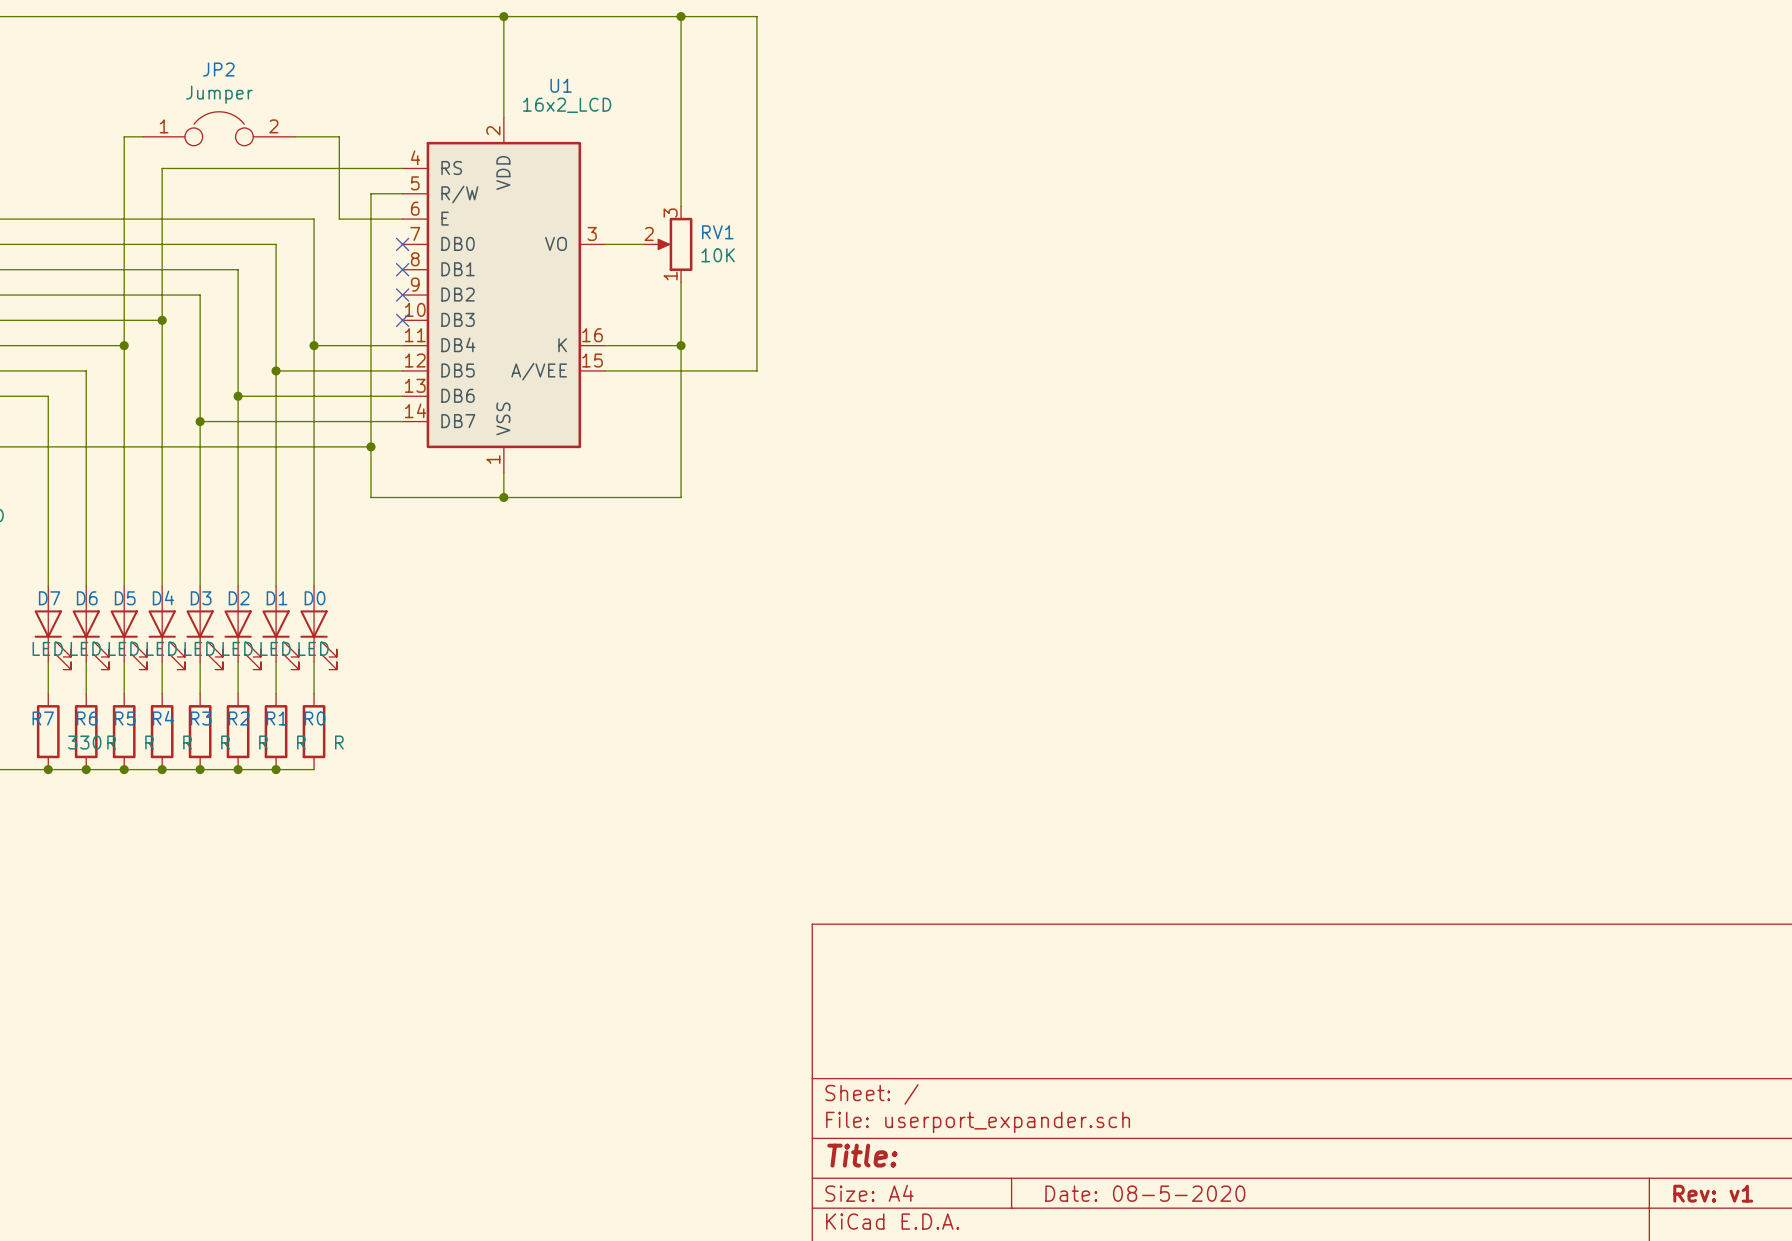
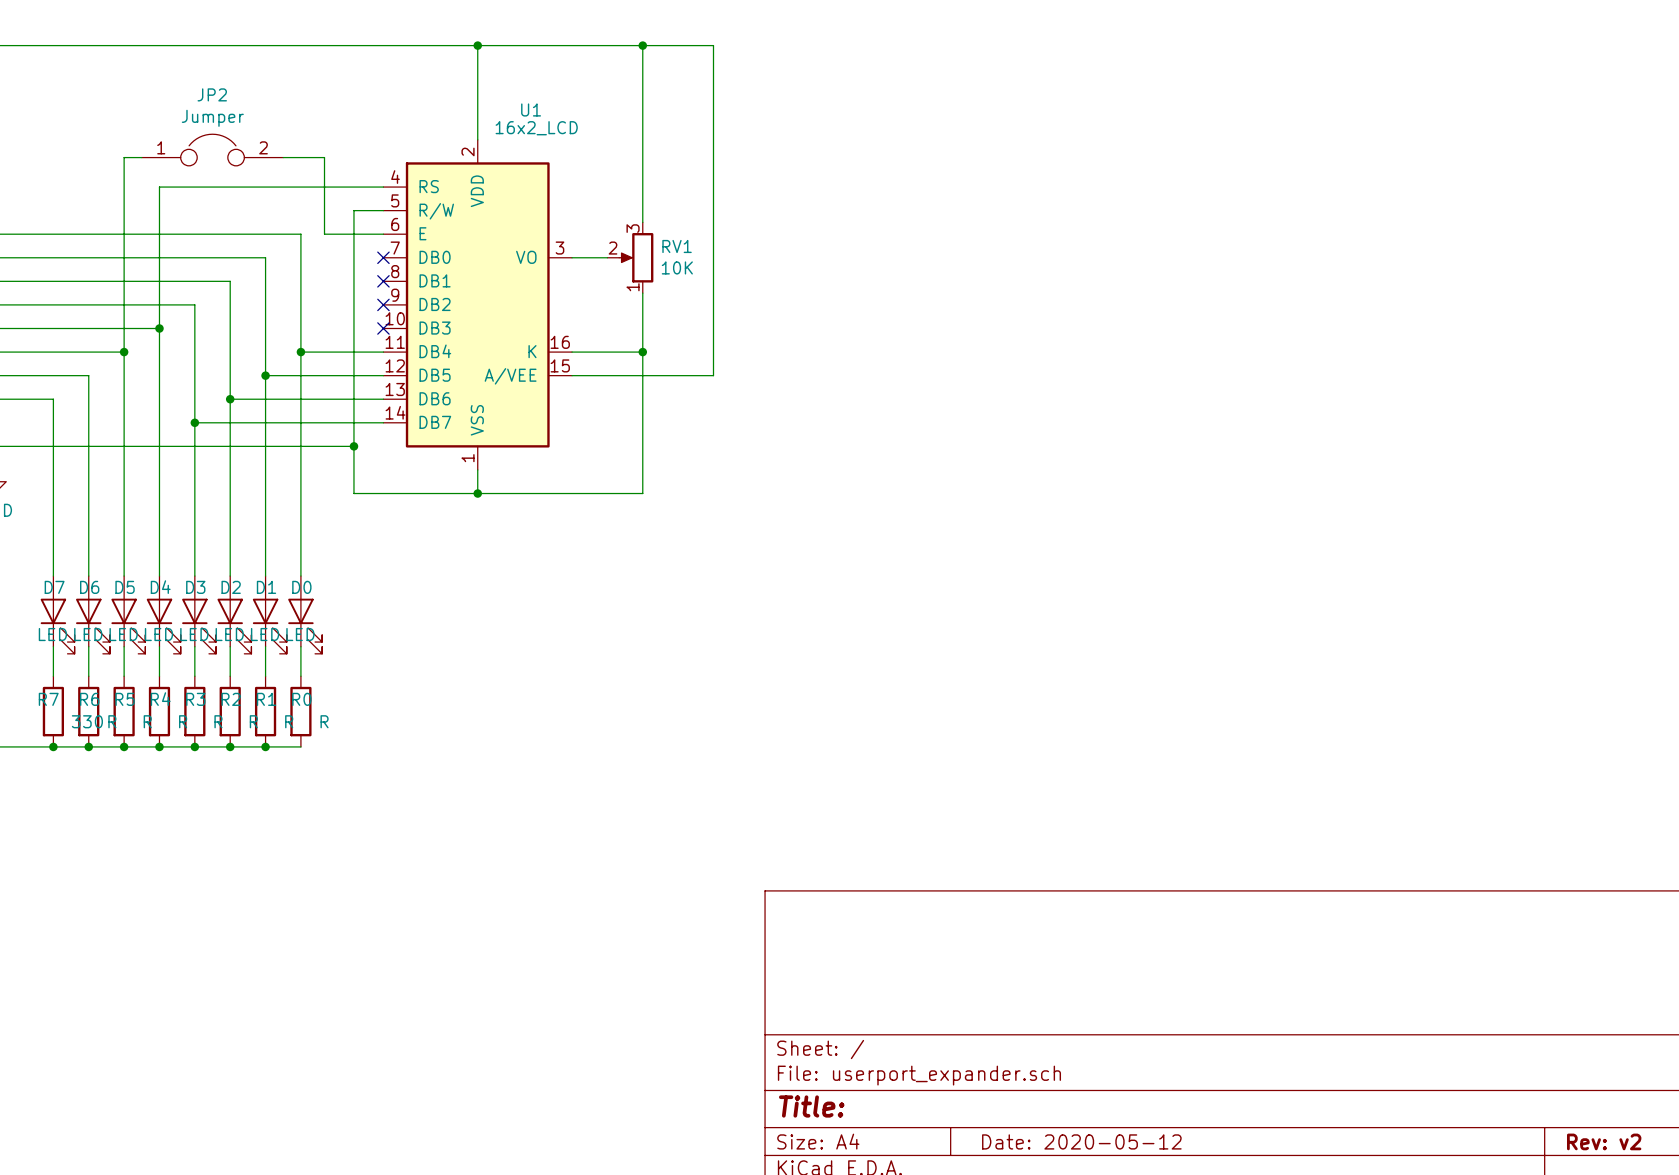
title block: Date: 08-5-2020 (1145, 1193) -> Date: 2020-05-12 (1081, 1141)
title block: Rev: v1 (1713, 1193) -> Rev: v2 (1604, 1141)

